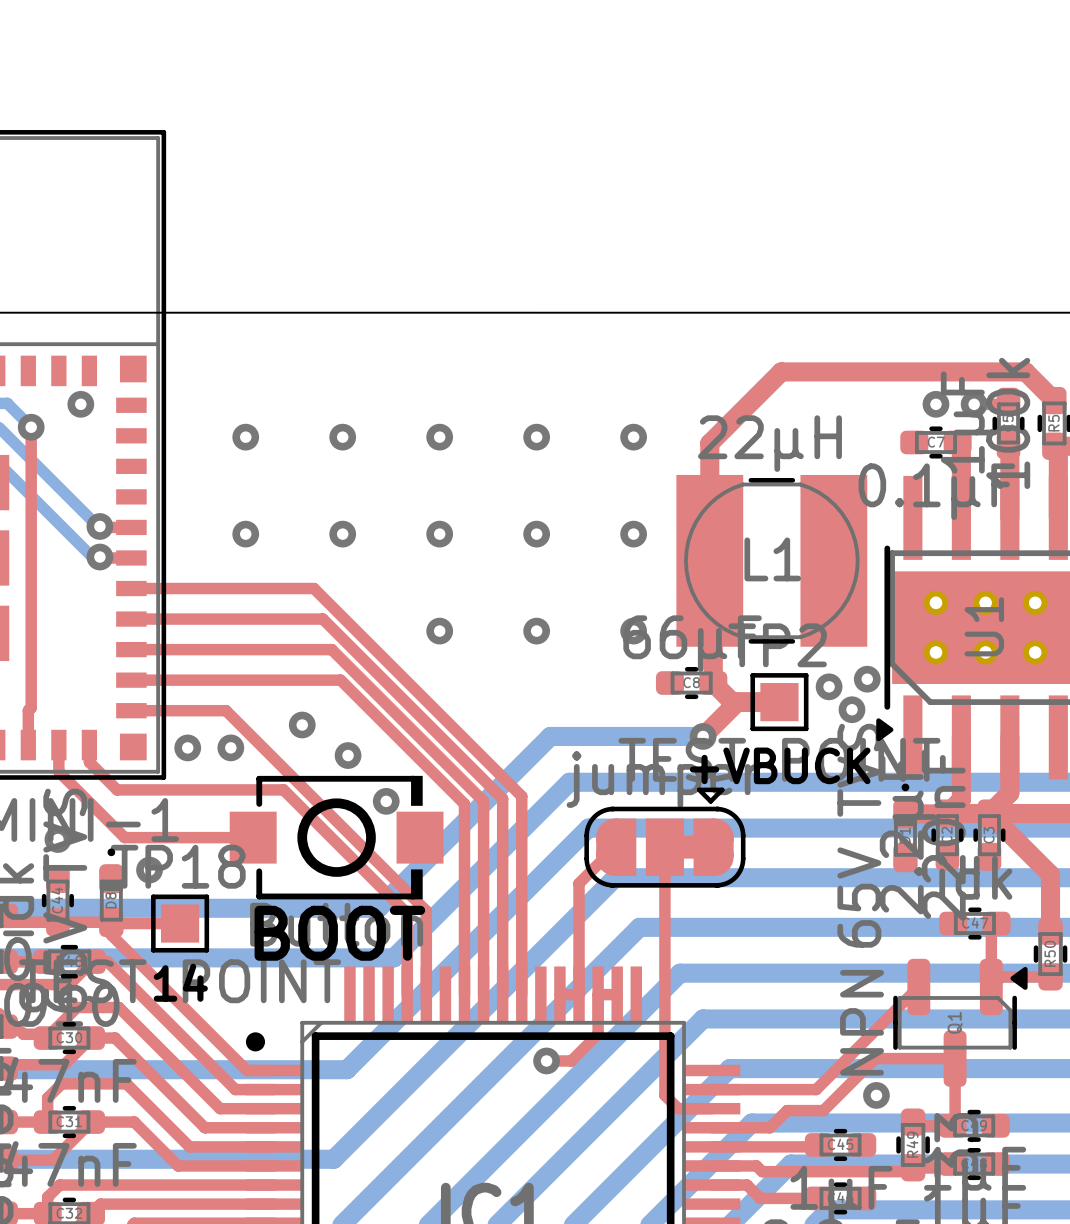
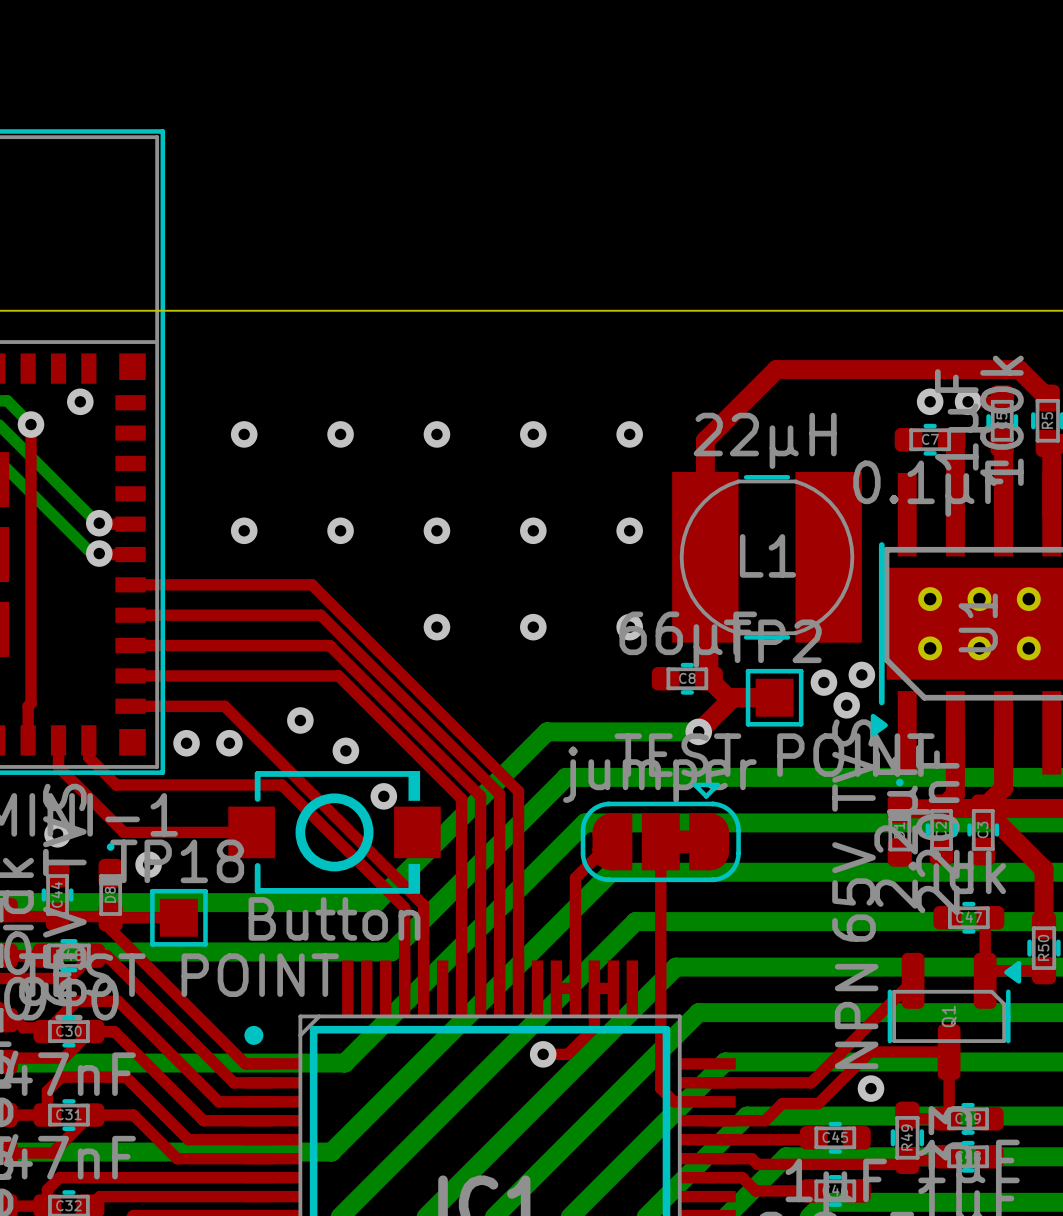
text: +VBUCK (780, 765) -> none
text: BOOT (339, 933) -> none
text: 14 (180, 982) -> none

